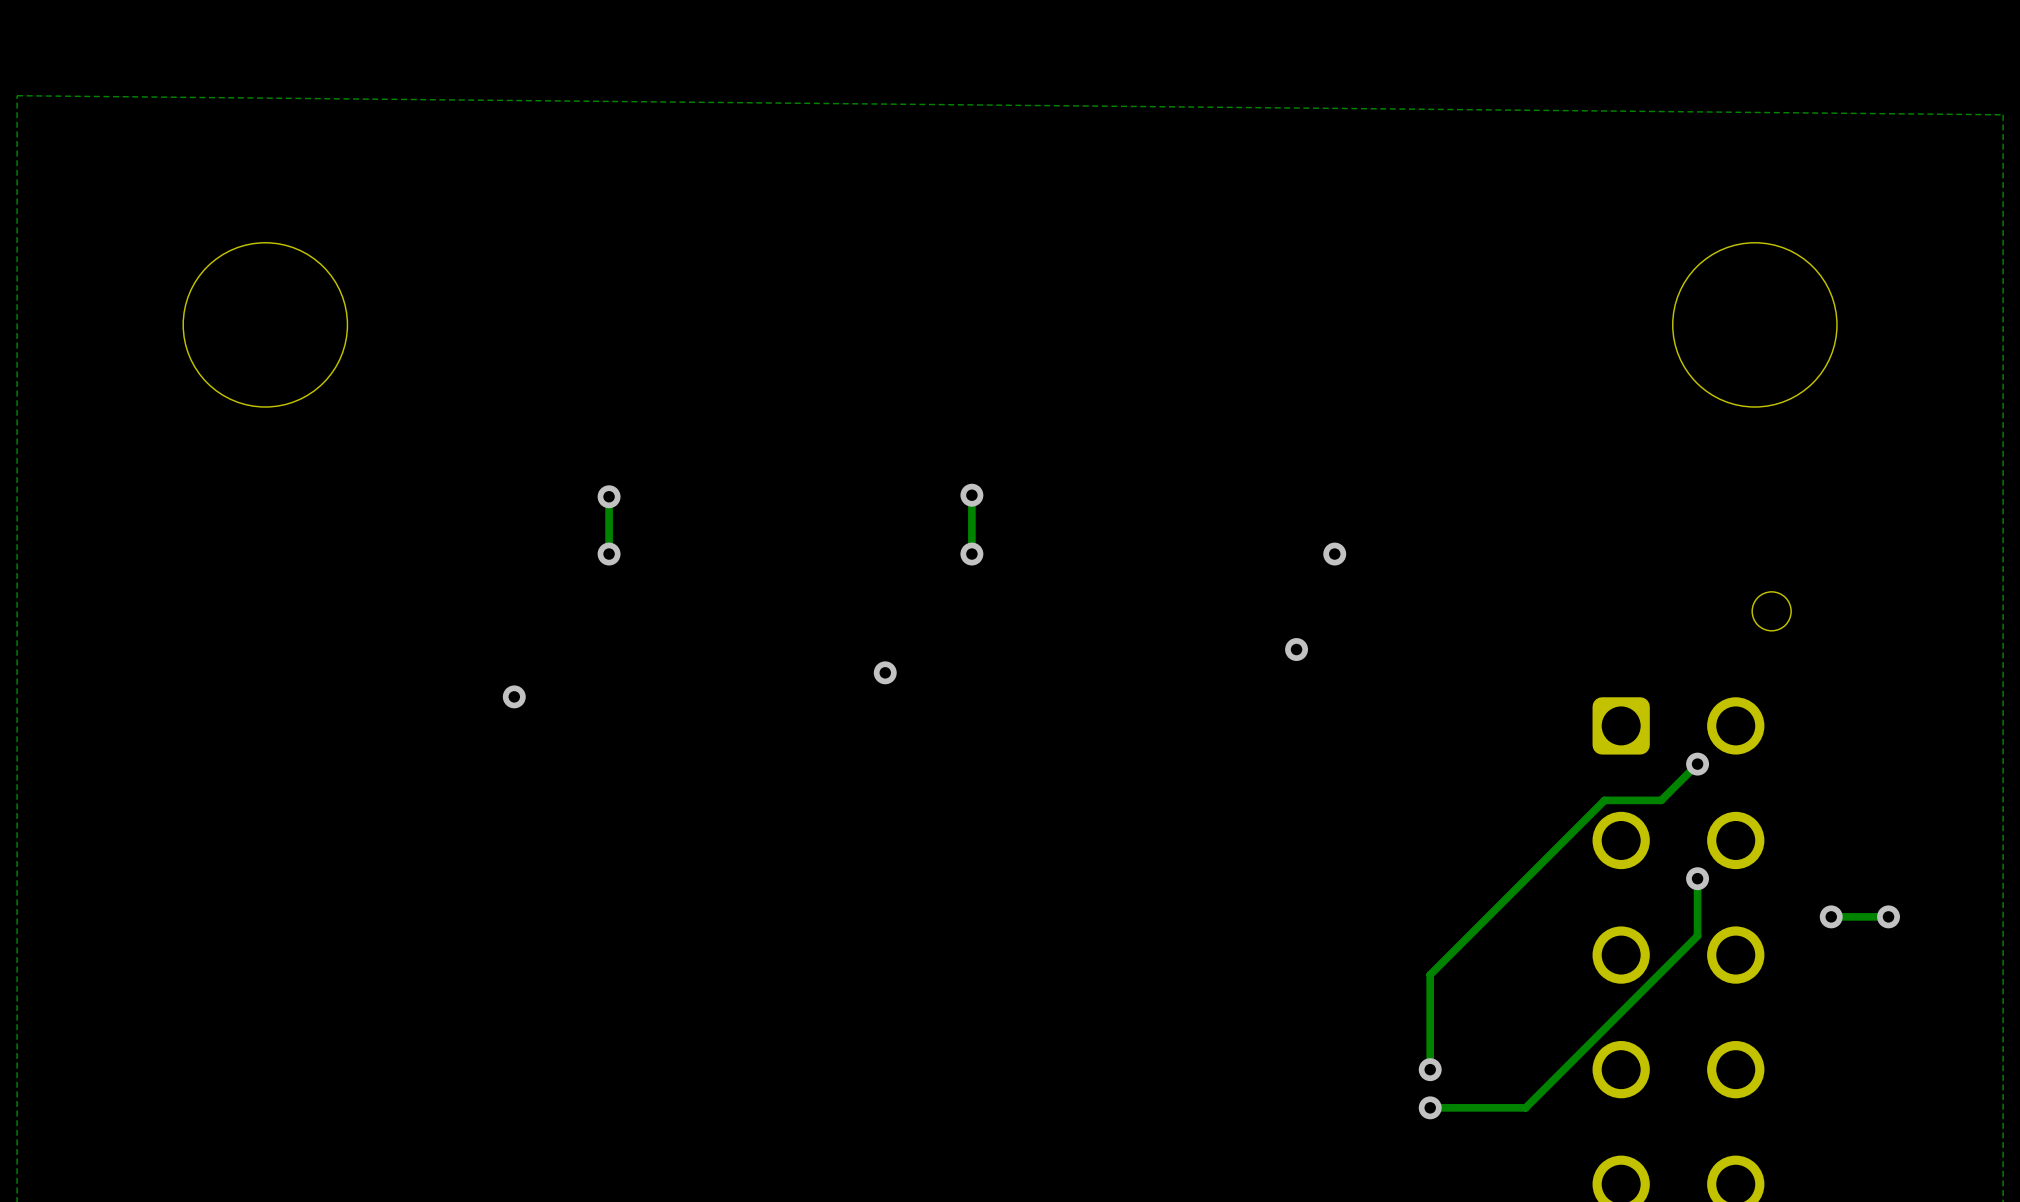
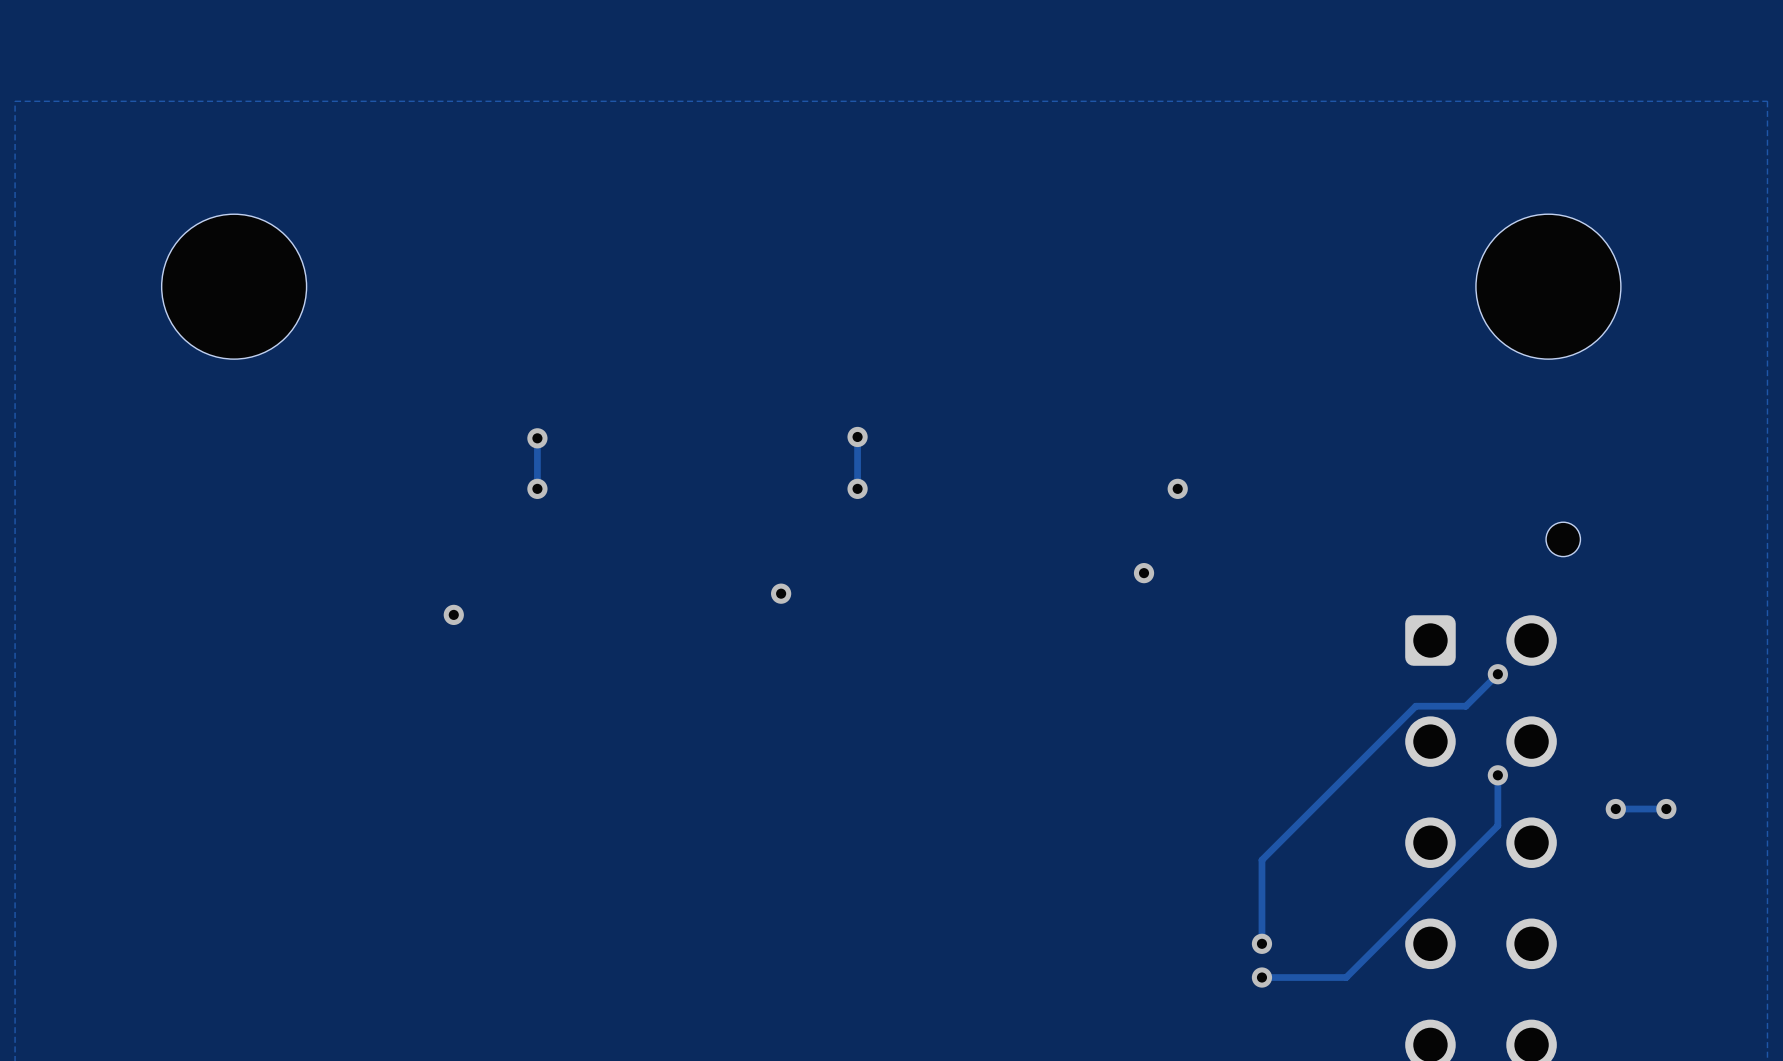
zone outline: (2003, 114) (17, 95) (17, 114) -> (1767, 101) (15, 101)

